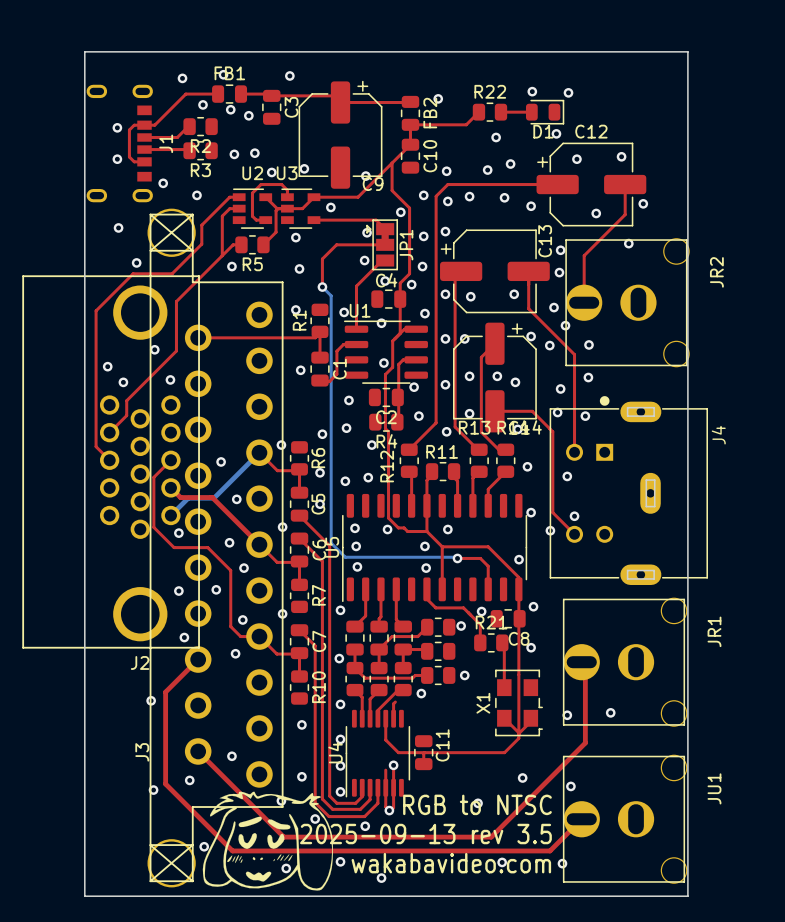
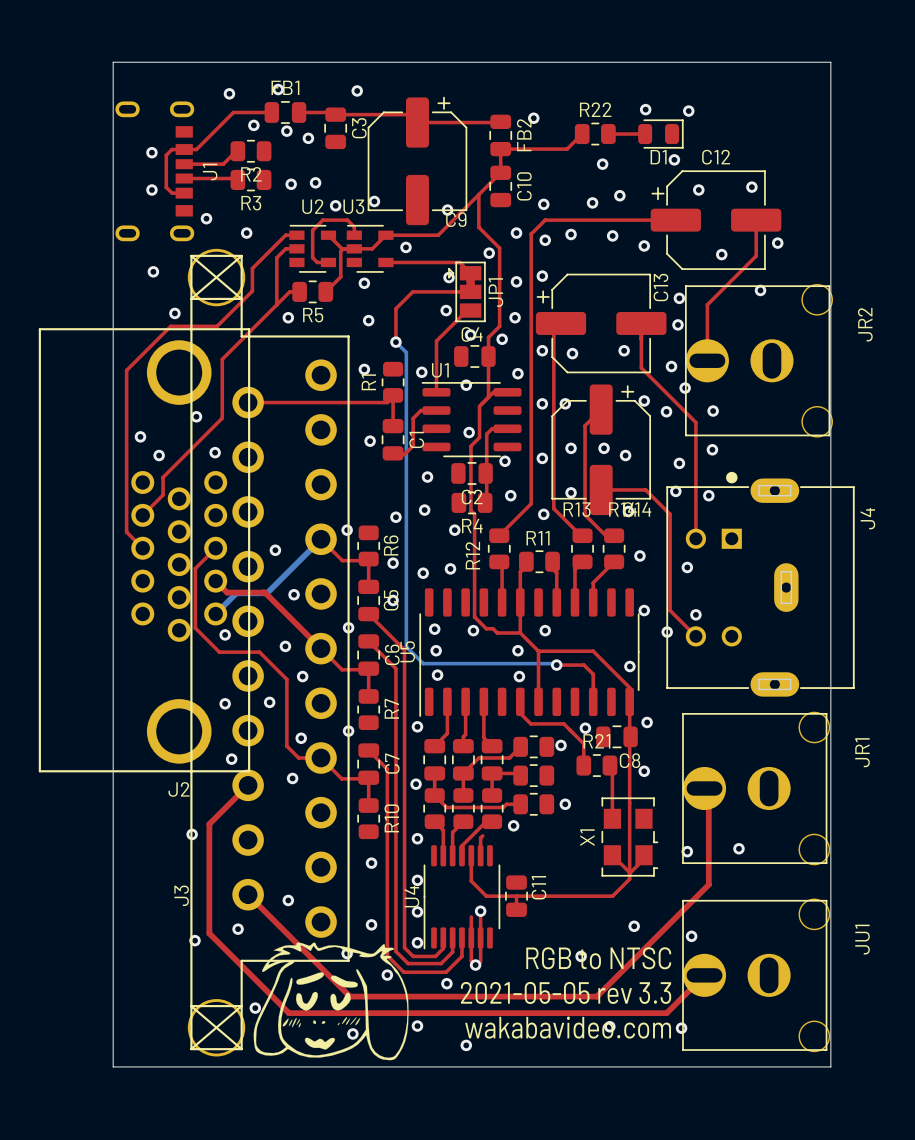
text: 2025-09-13 rev 3.5 (425, 834) -> 2021-05-05 rev 3.3 (566, 992)

